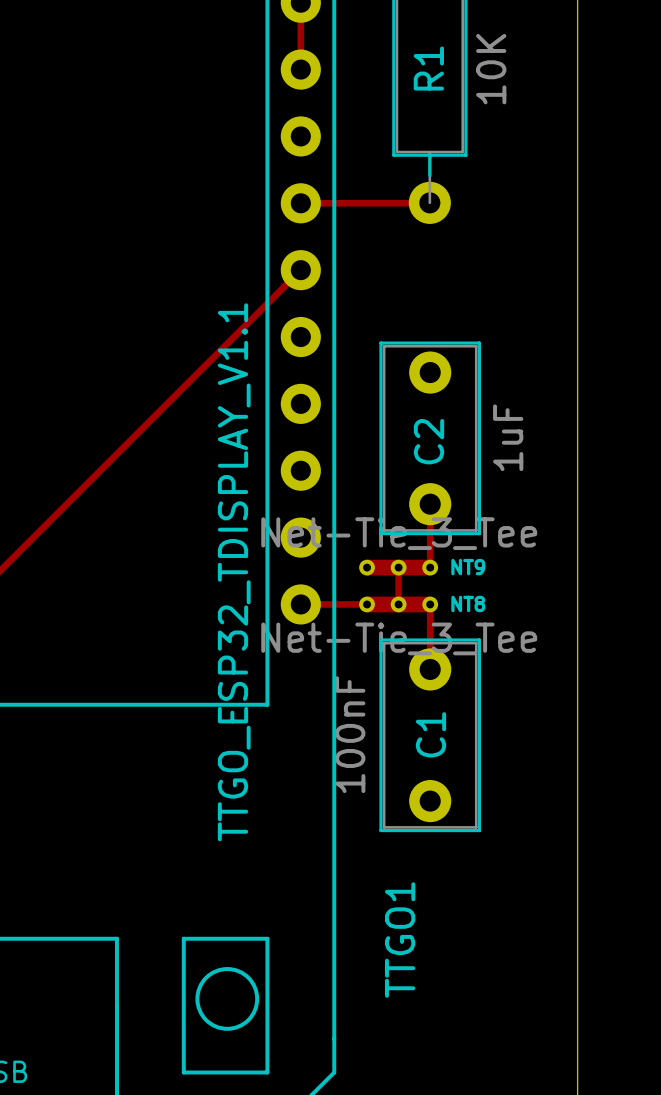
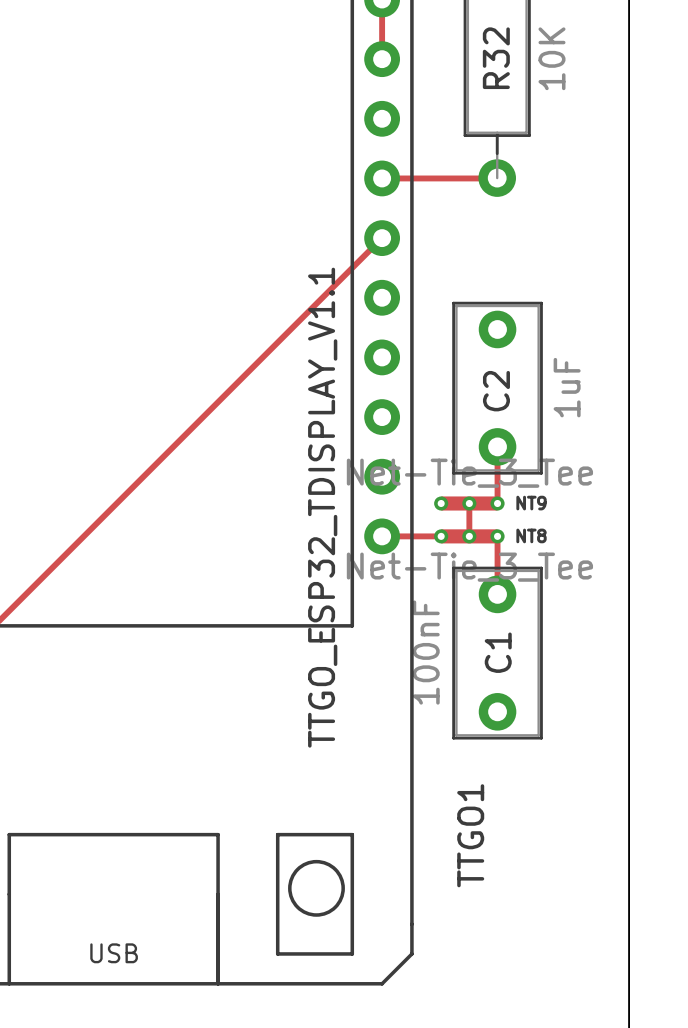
R1 name: R1 (428, 68) -> R32 (496, 58)

